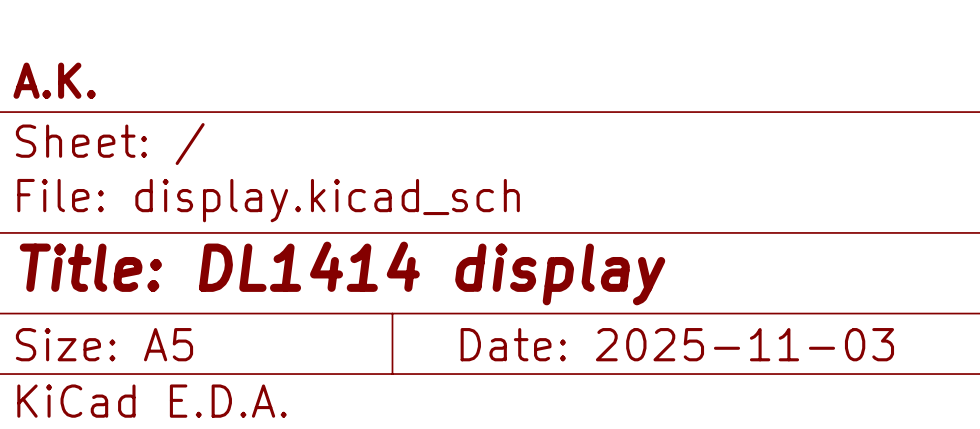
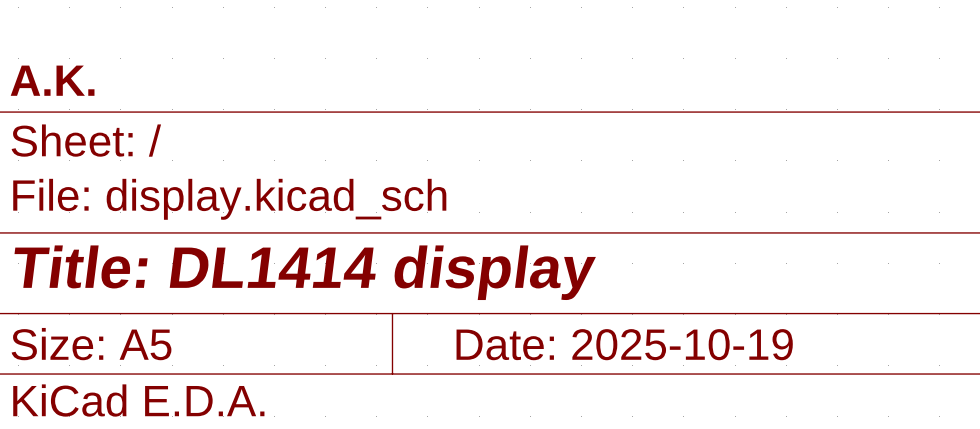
title block: Date: 2025-11-03 (677, 344) -> Date: 2025-10-19 (624, 344)

